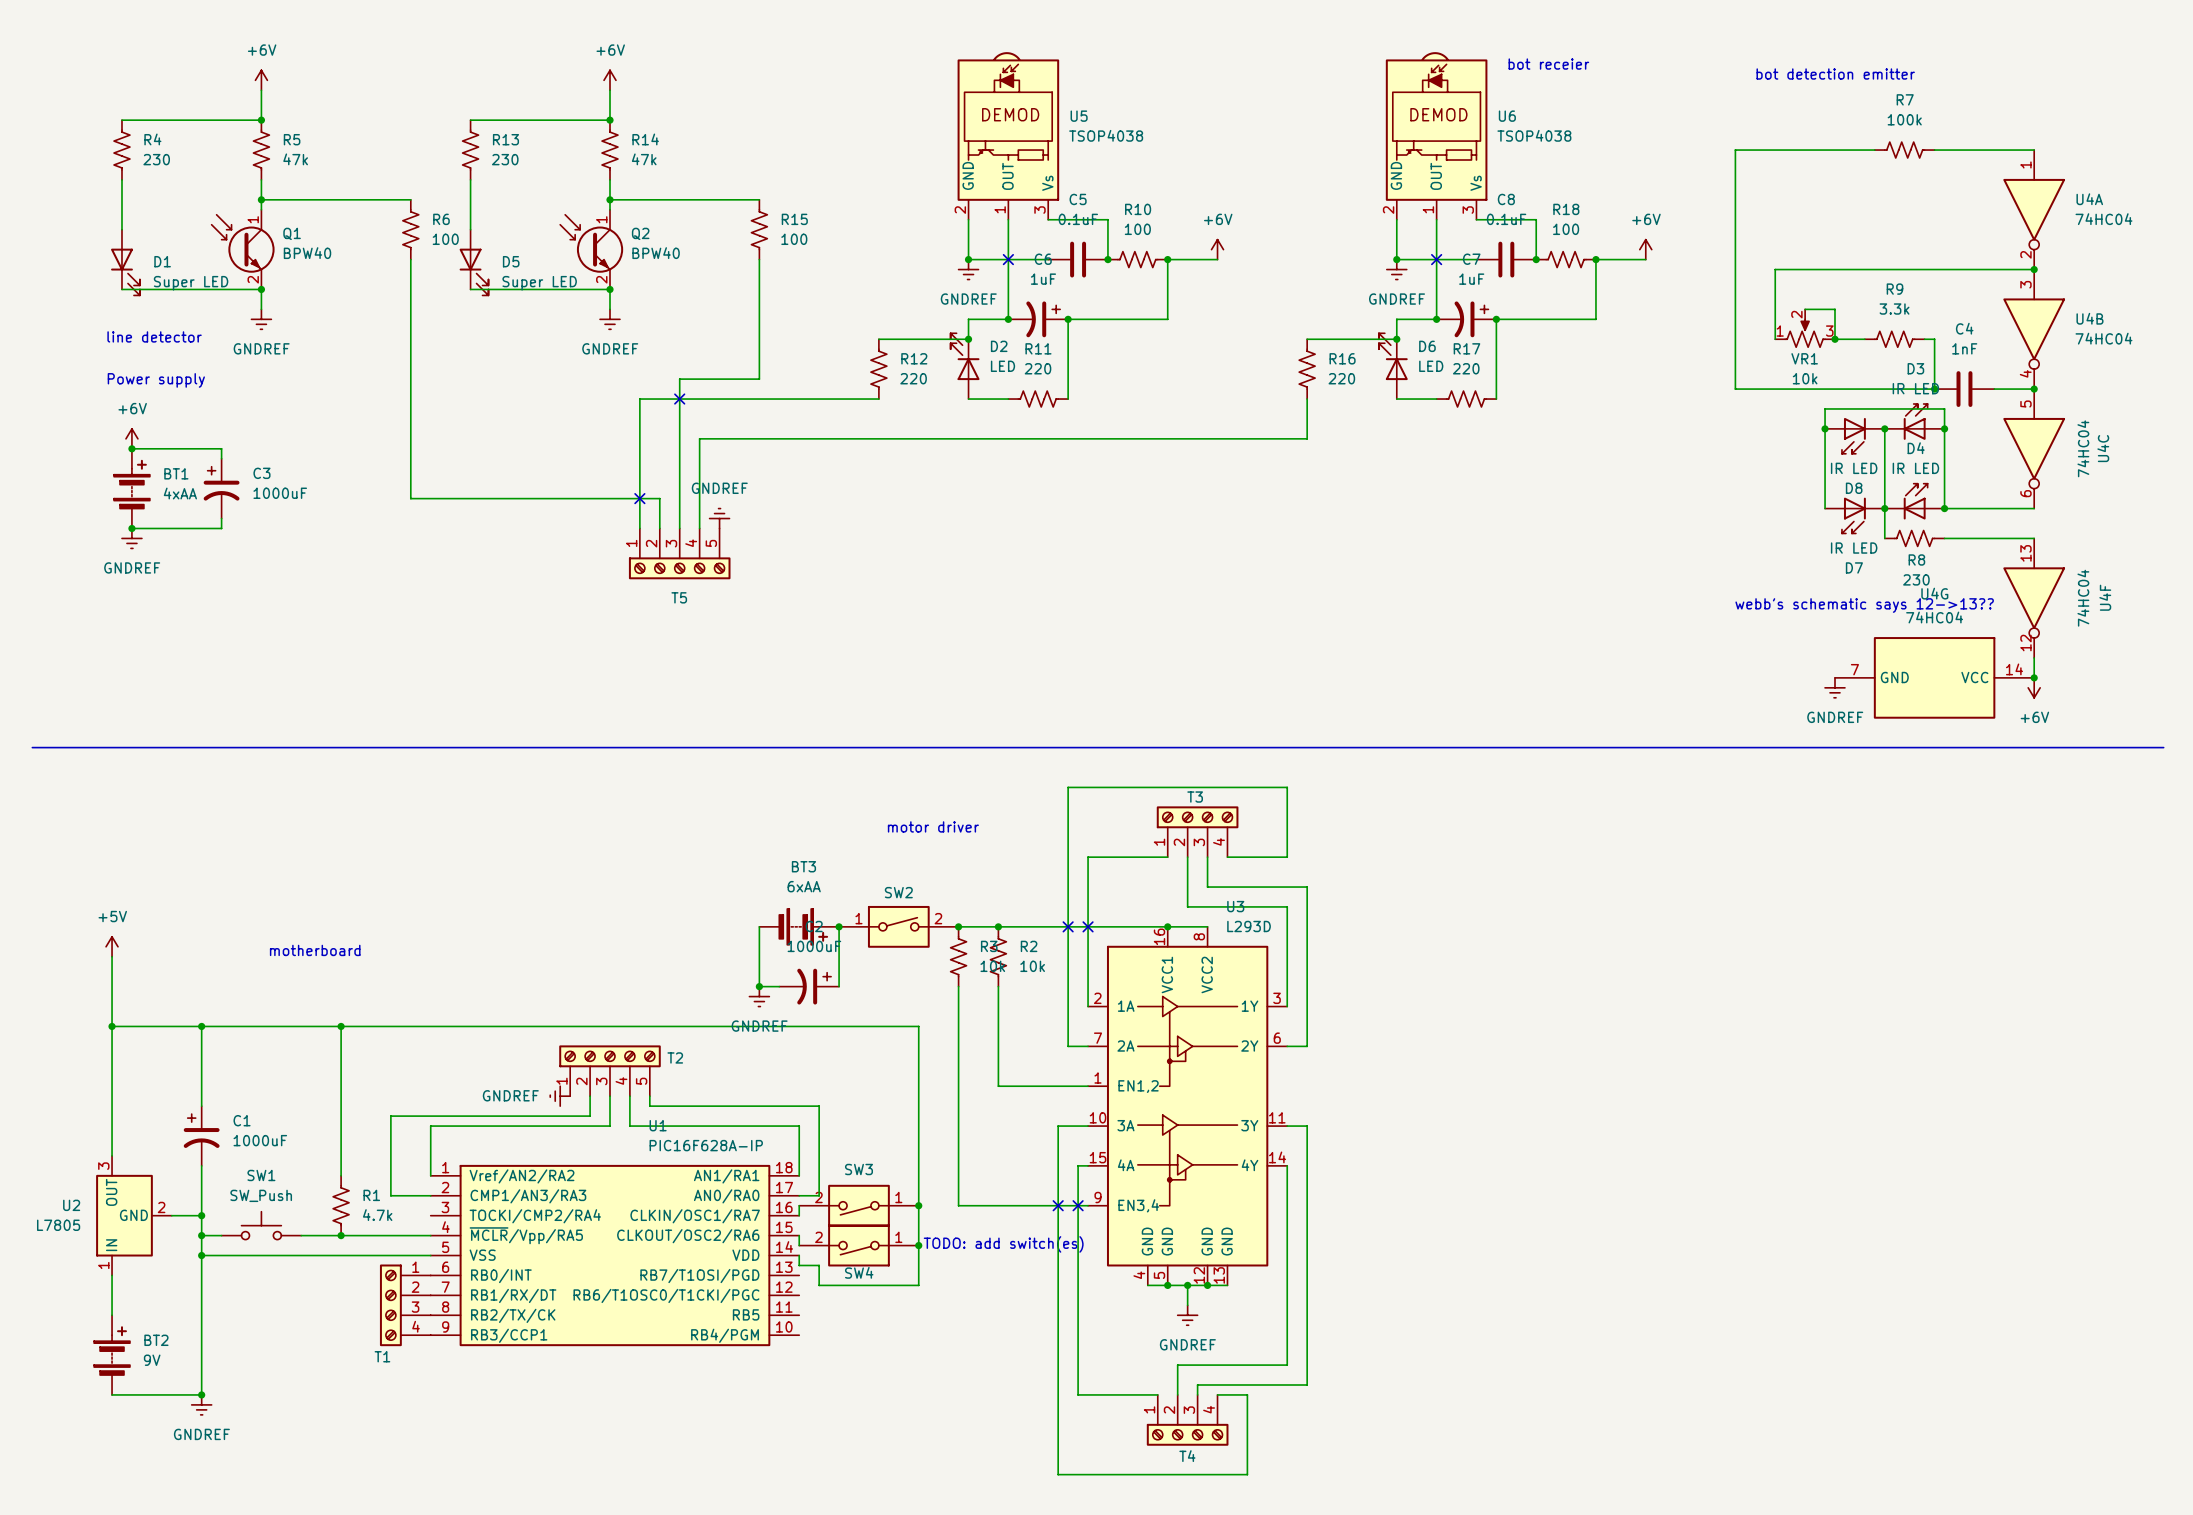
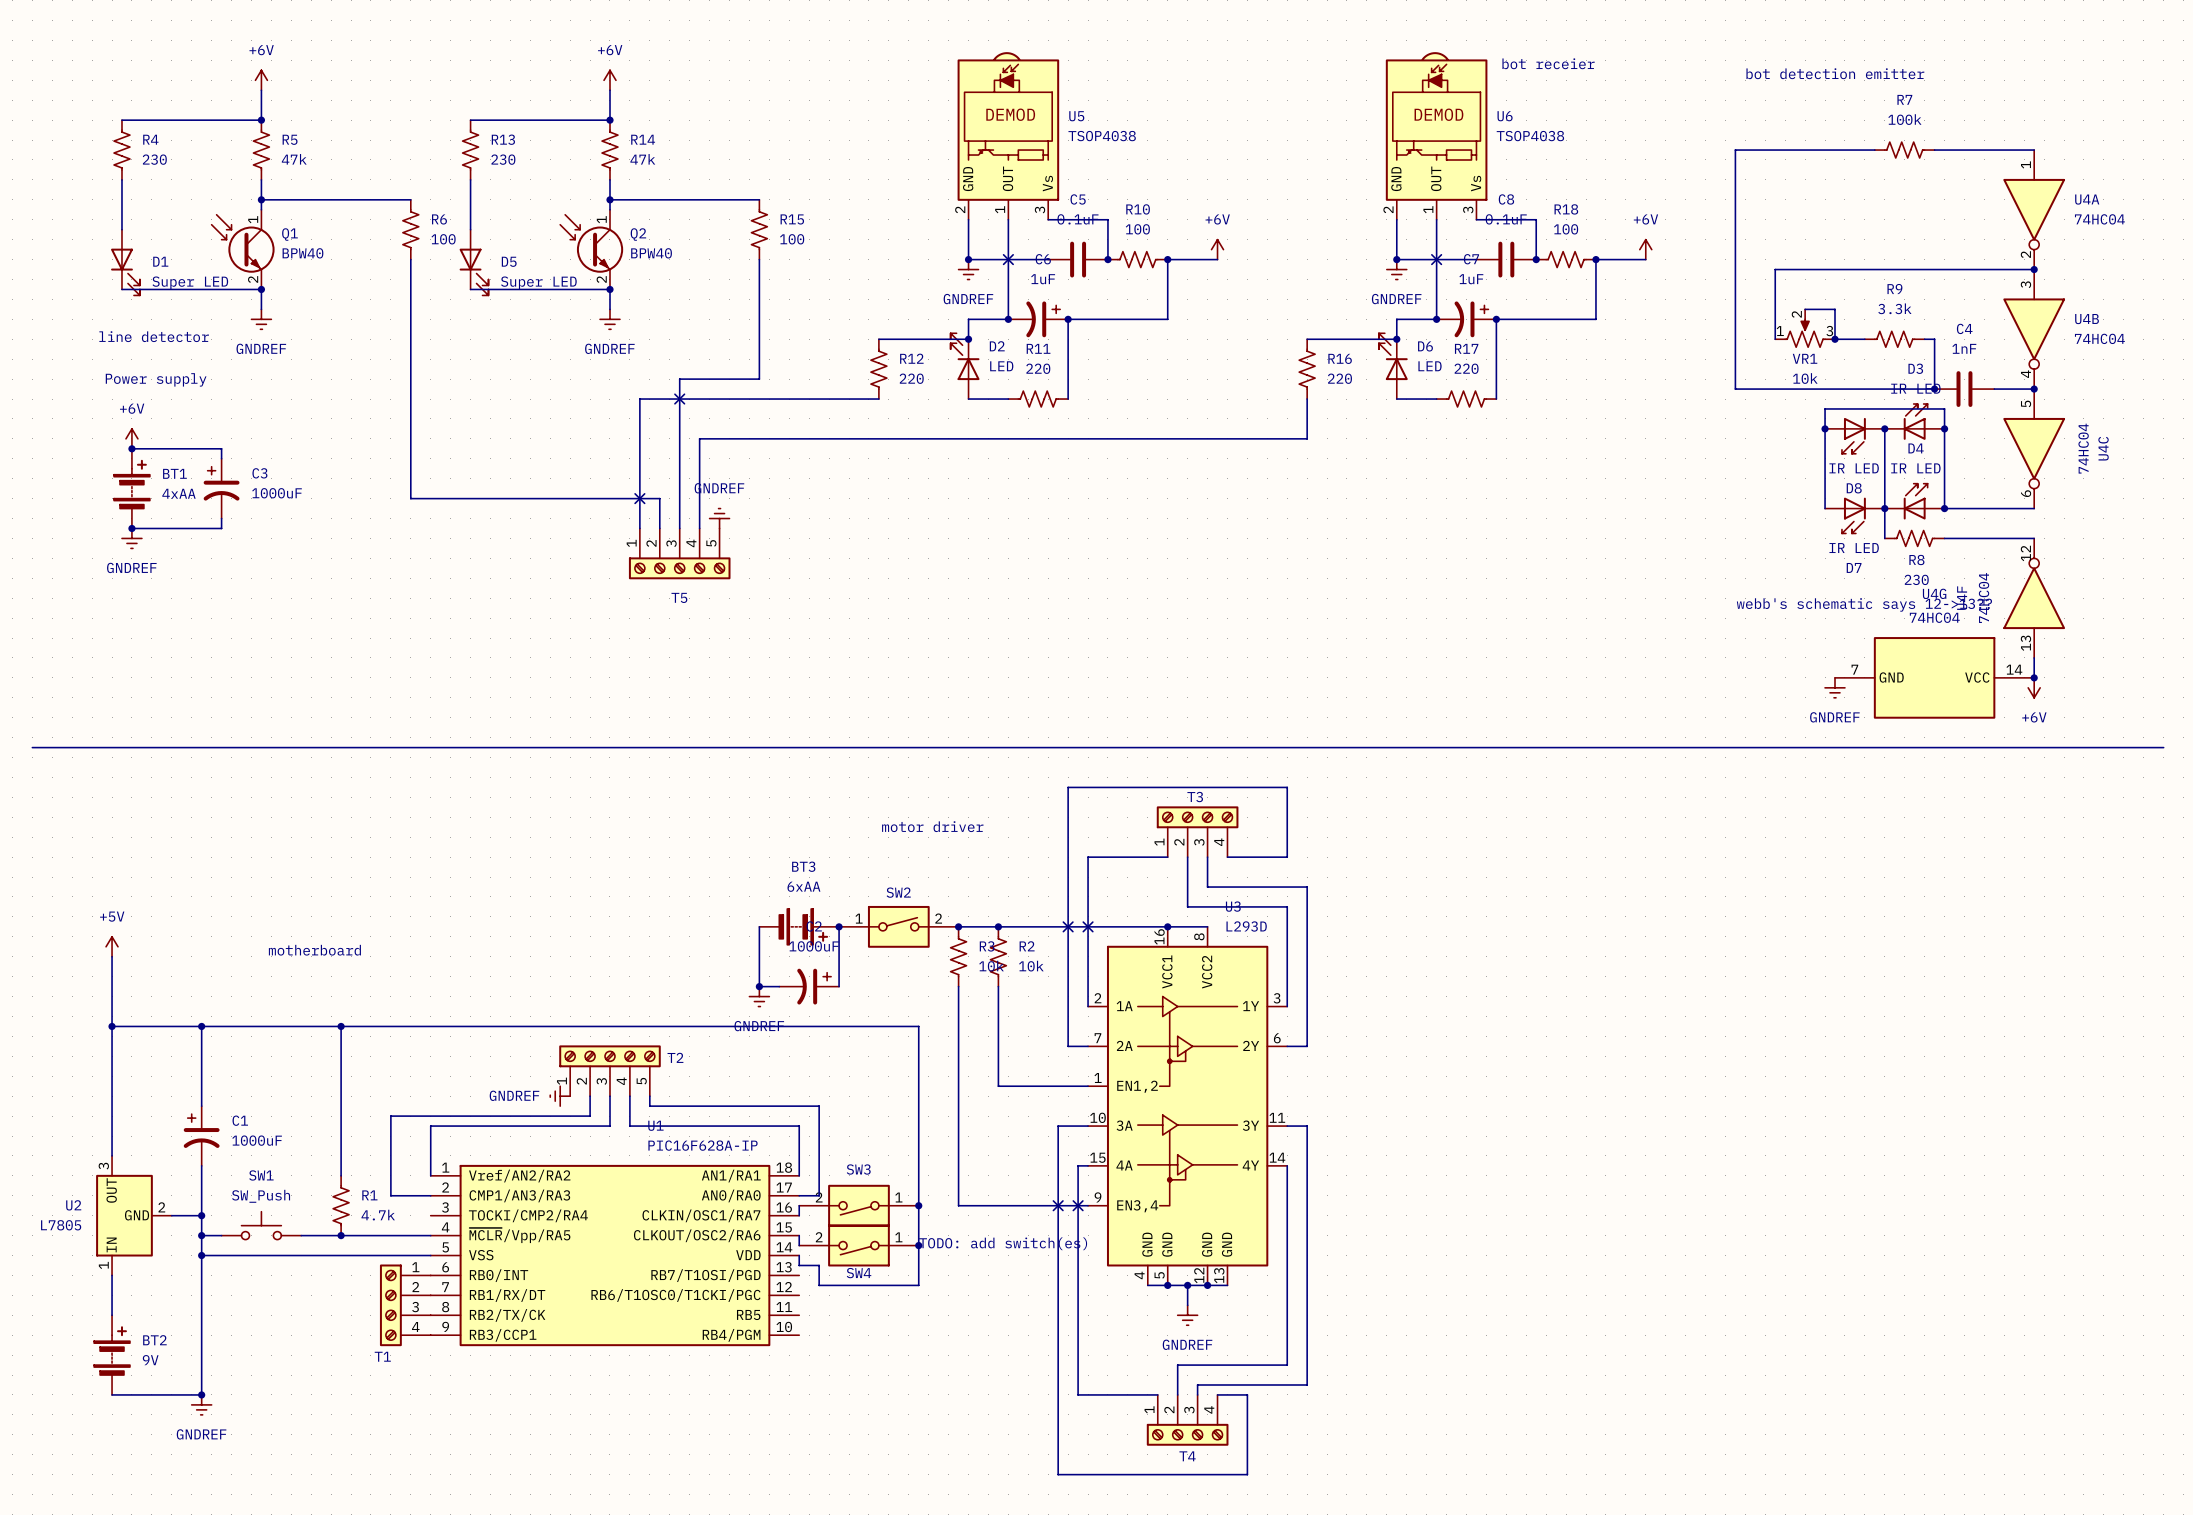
U4F rotation: 0° (2034, 598) -> 180° (2034, 598)

